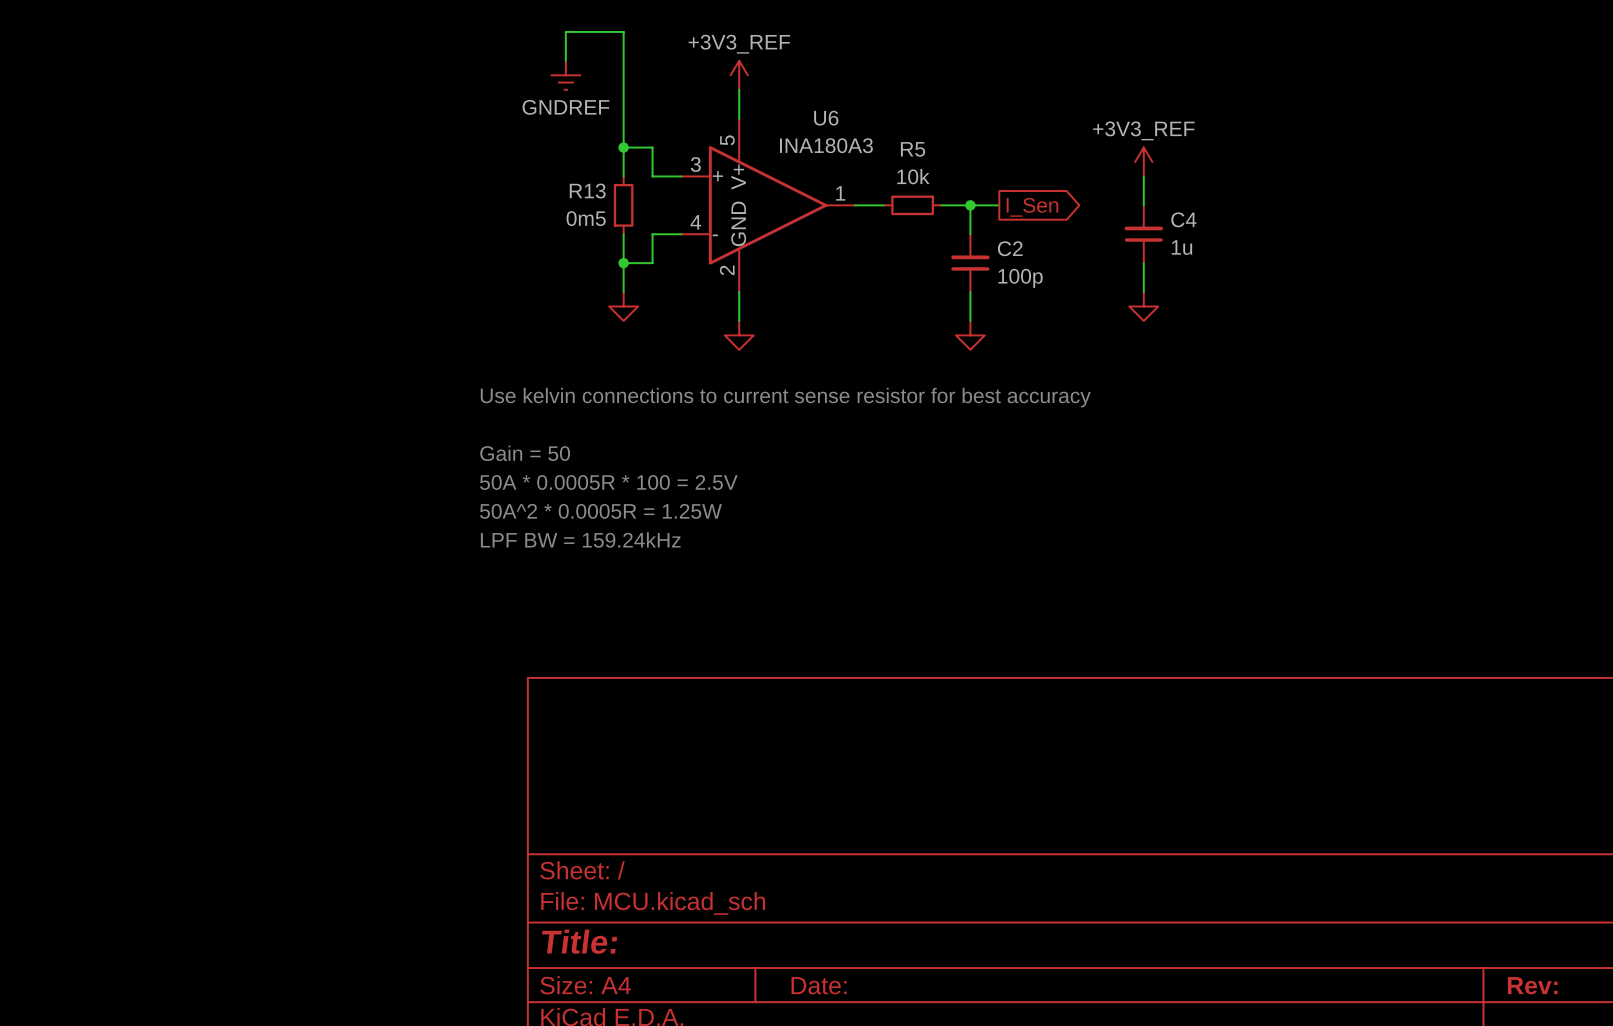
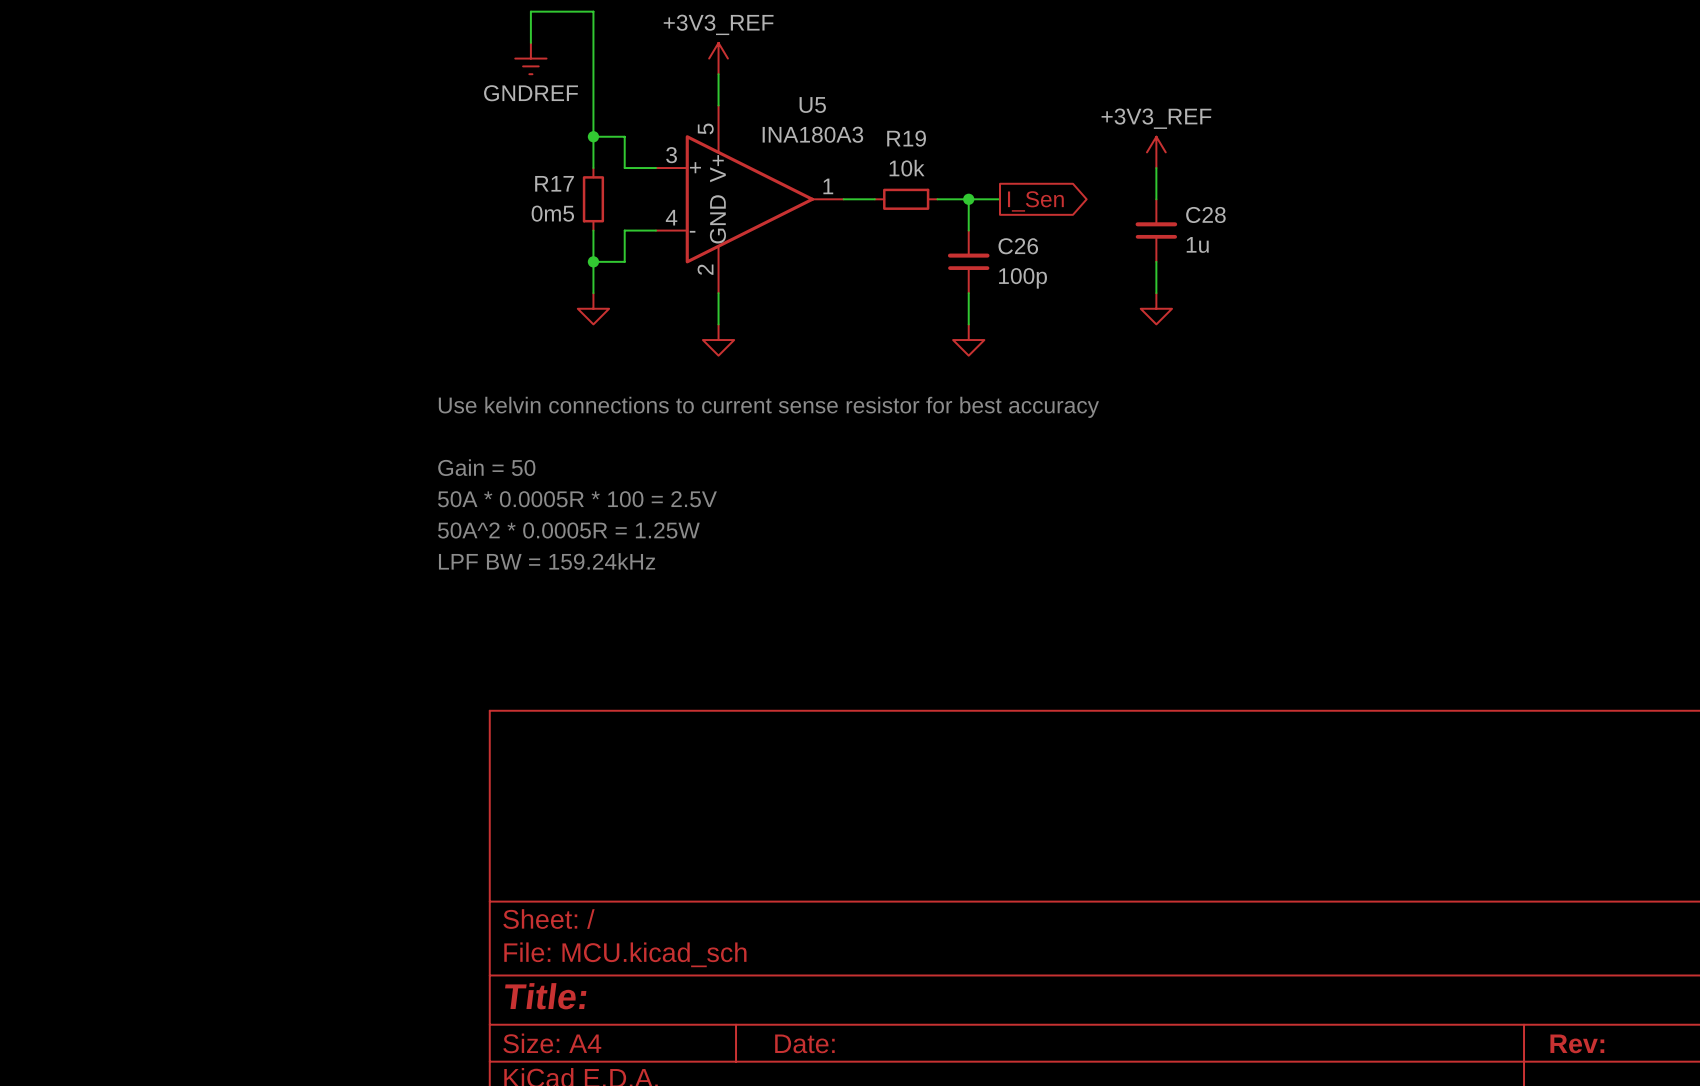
U6 name: U6 (826, 118) -> U5 (812, 105)
R5 name: R5 (913, 149) -> R19 (906, 138)
R13 name: R13 (587, 191) -> R17 (554, 183)
C4 name: C4 (1183, 219) -> C28 (1205, 214)
C2 name: C2 (1010, 248) -> C26 (1018, 246)

